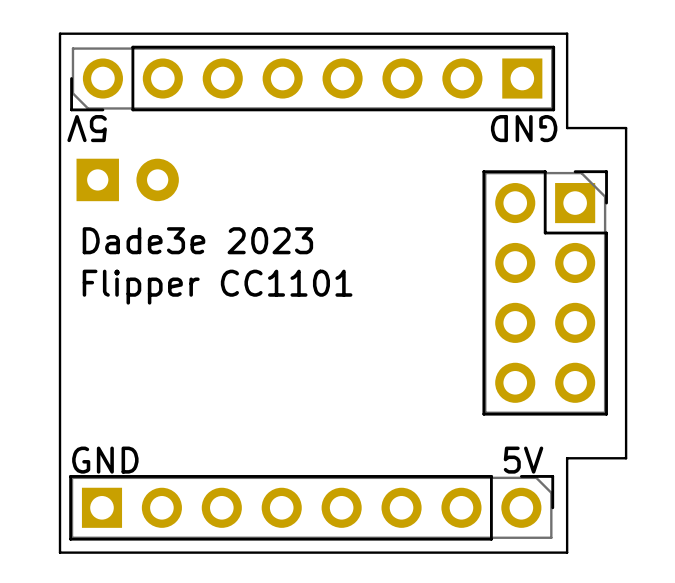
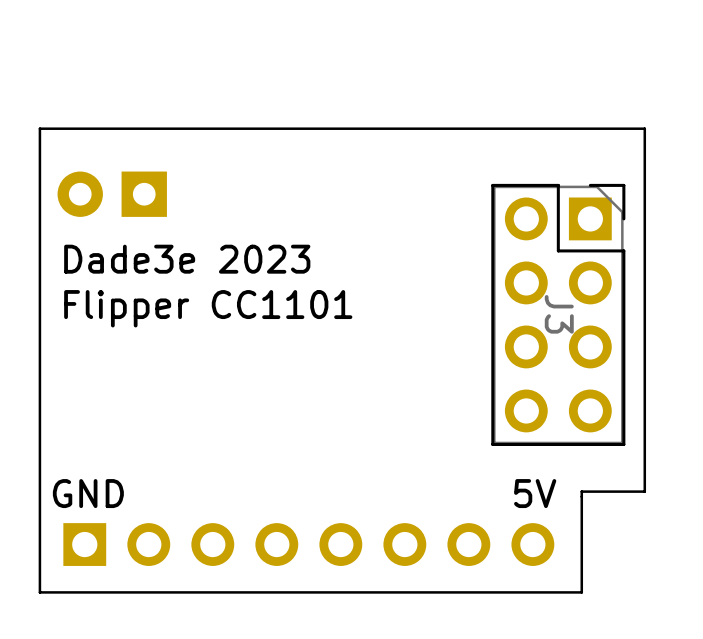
part: (312, 78) -> none
board edge: (60, 118) (60, 33) (567, 33) (567, 128) (626, 128) -> (39, 128) (644, 128) (644, 138)
text: 5V (87, 128) -> none
text: GND (524, 128) -> none
part rotation: 0° (127, 179) -> 180° (112, 194)
J3 name: none -> J3 (559, 314)
part side: bottom (311, 507) -> top (308, 544)

